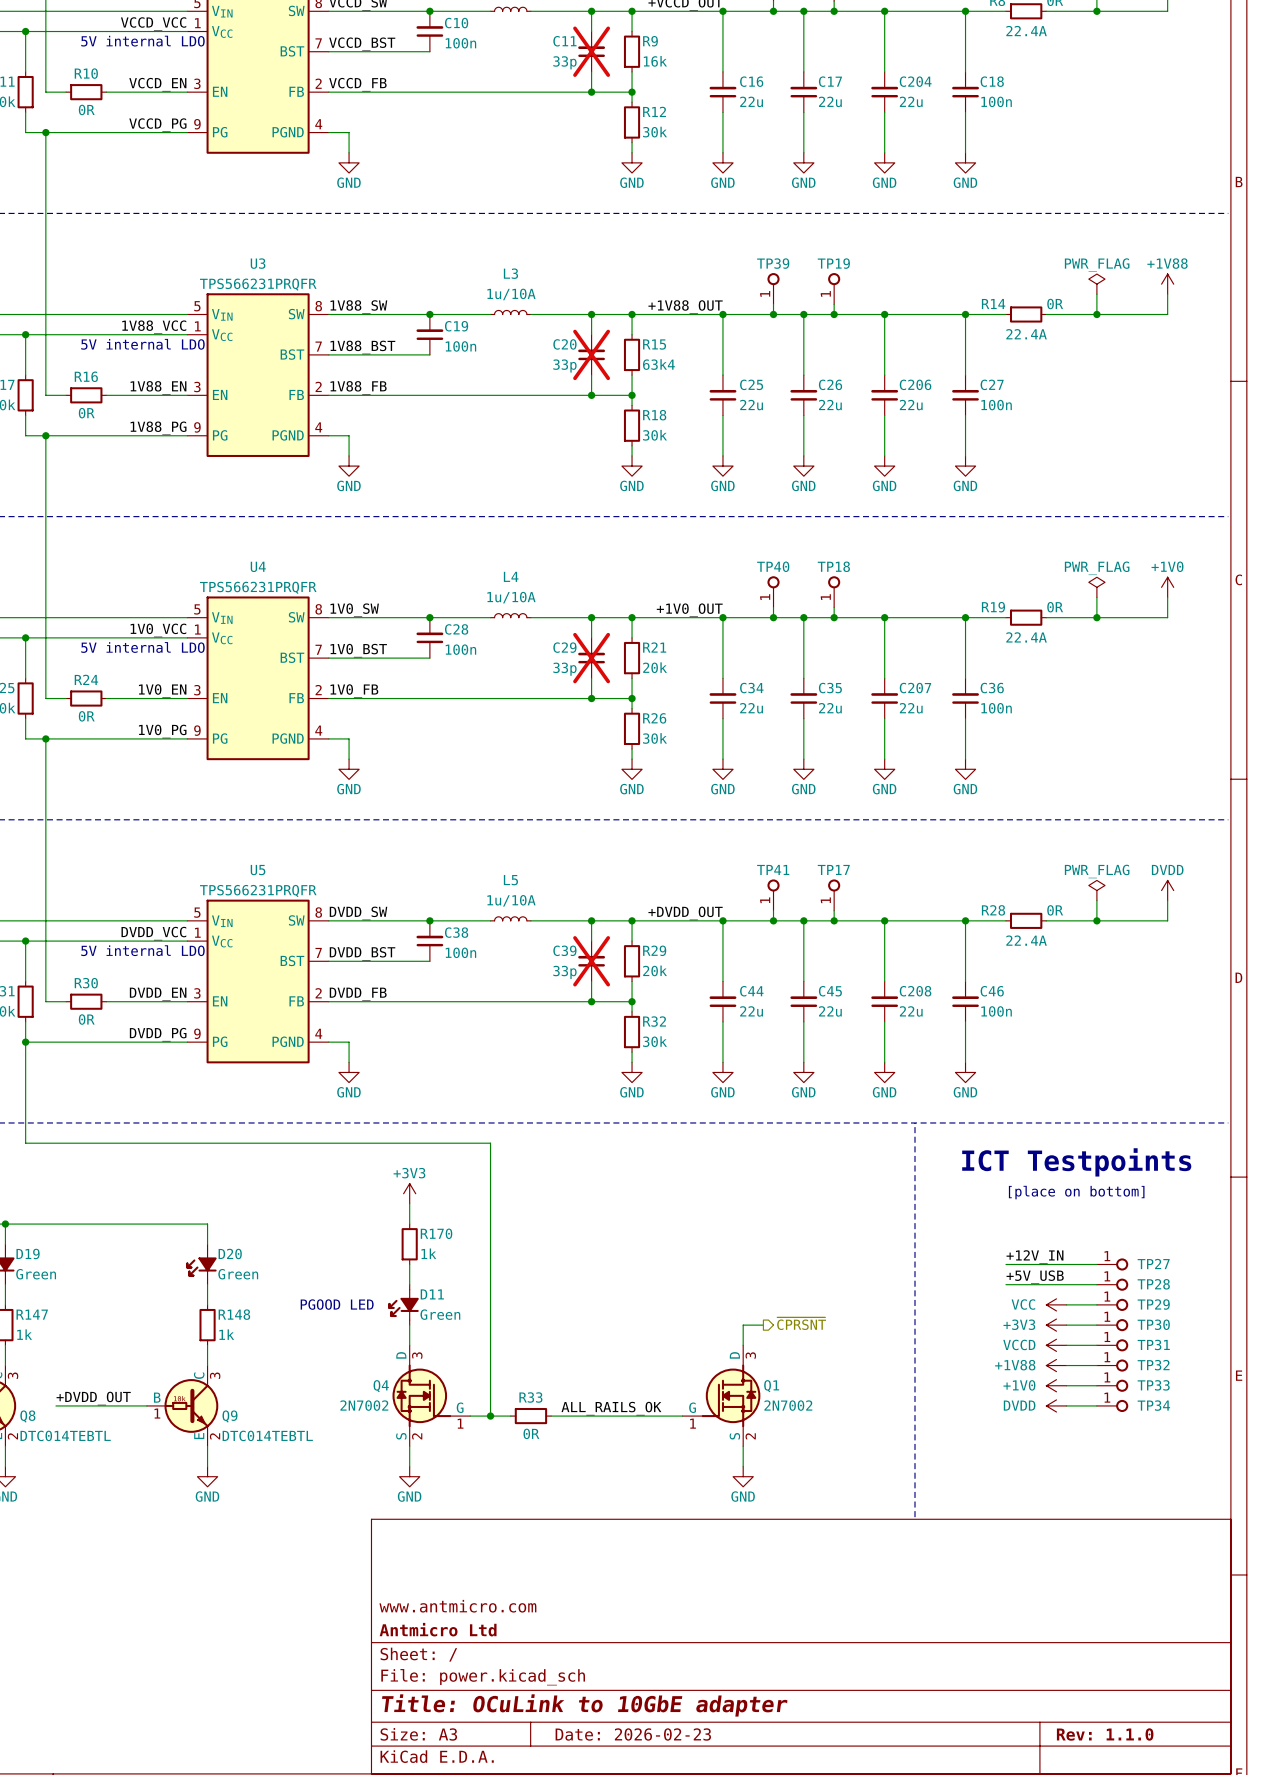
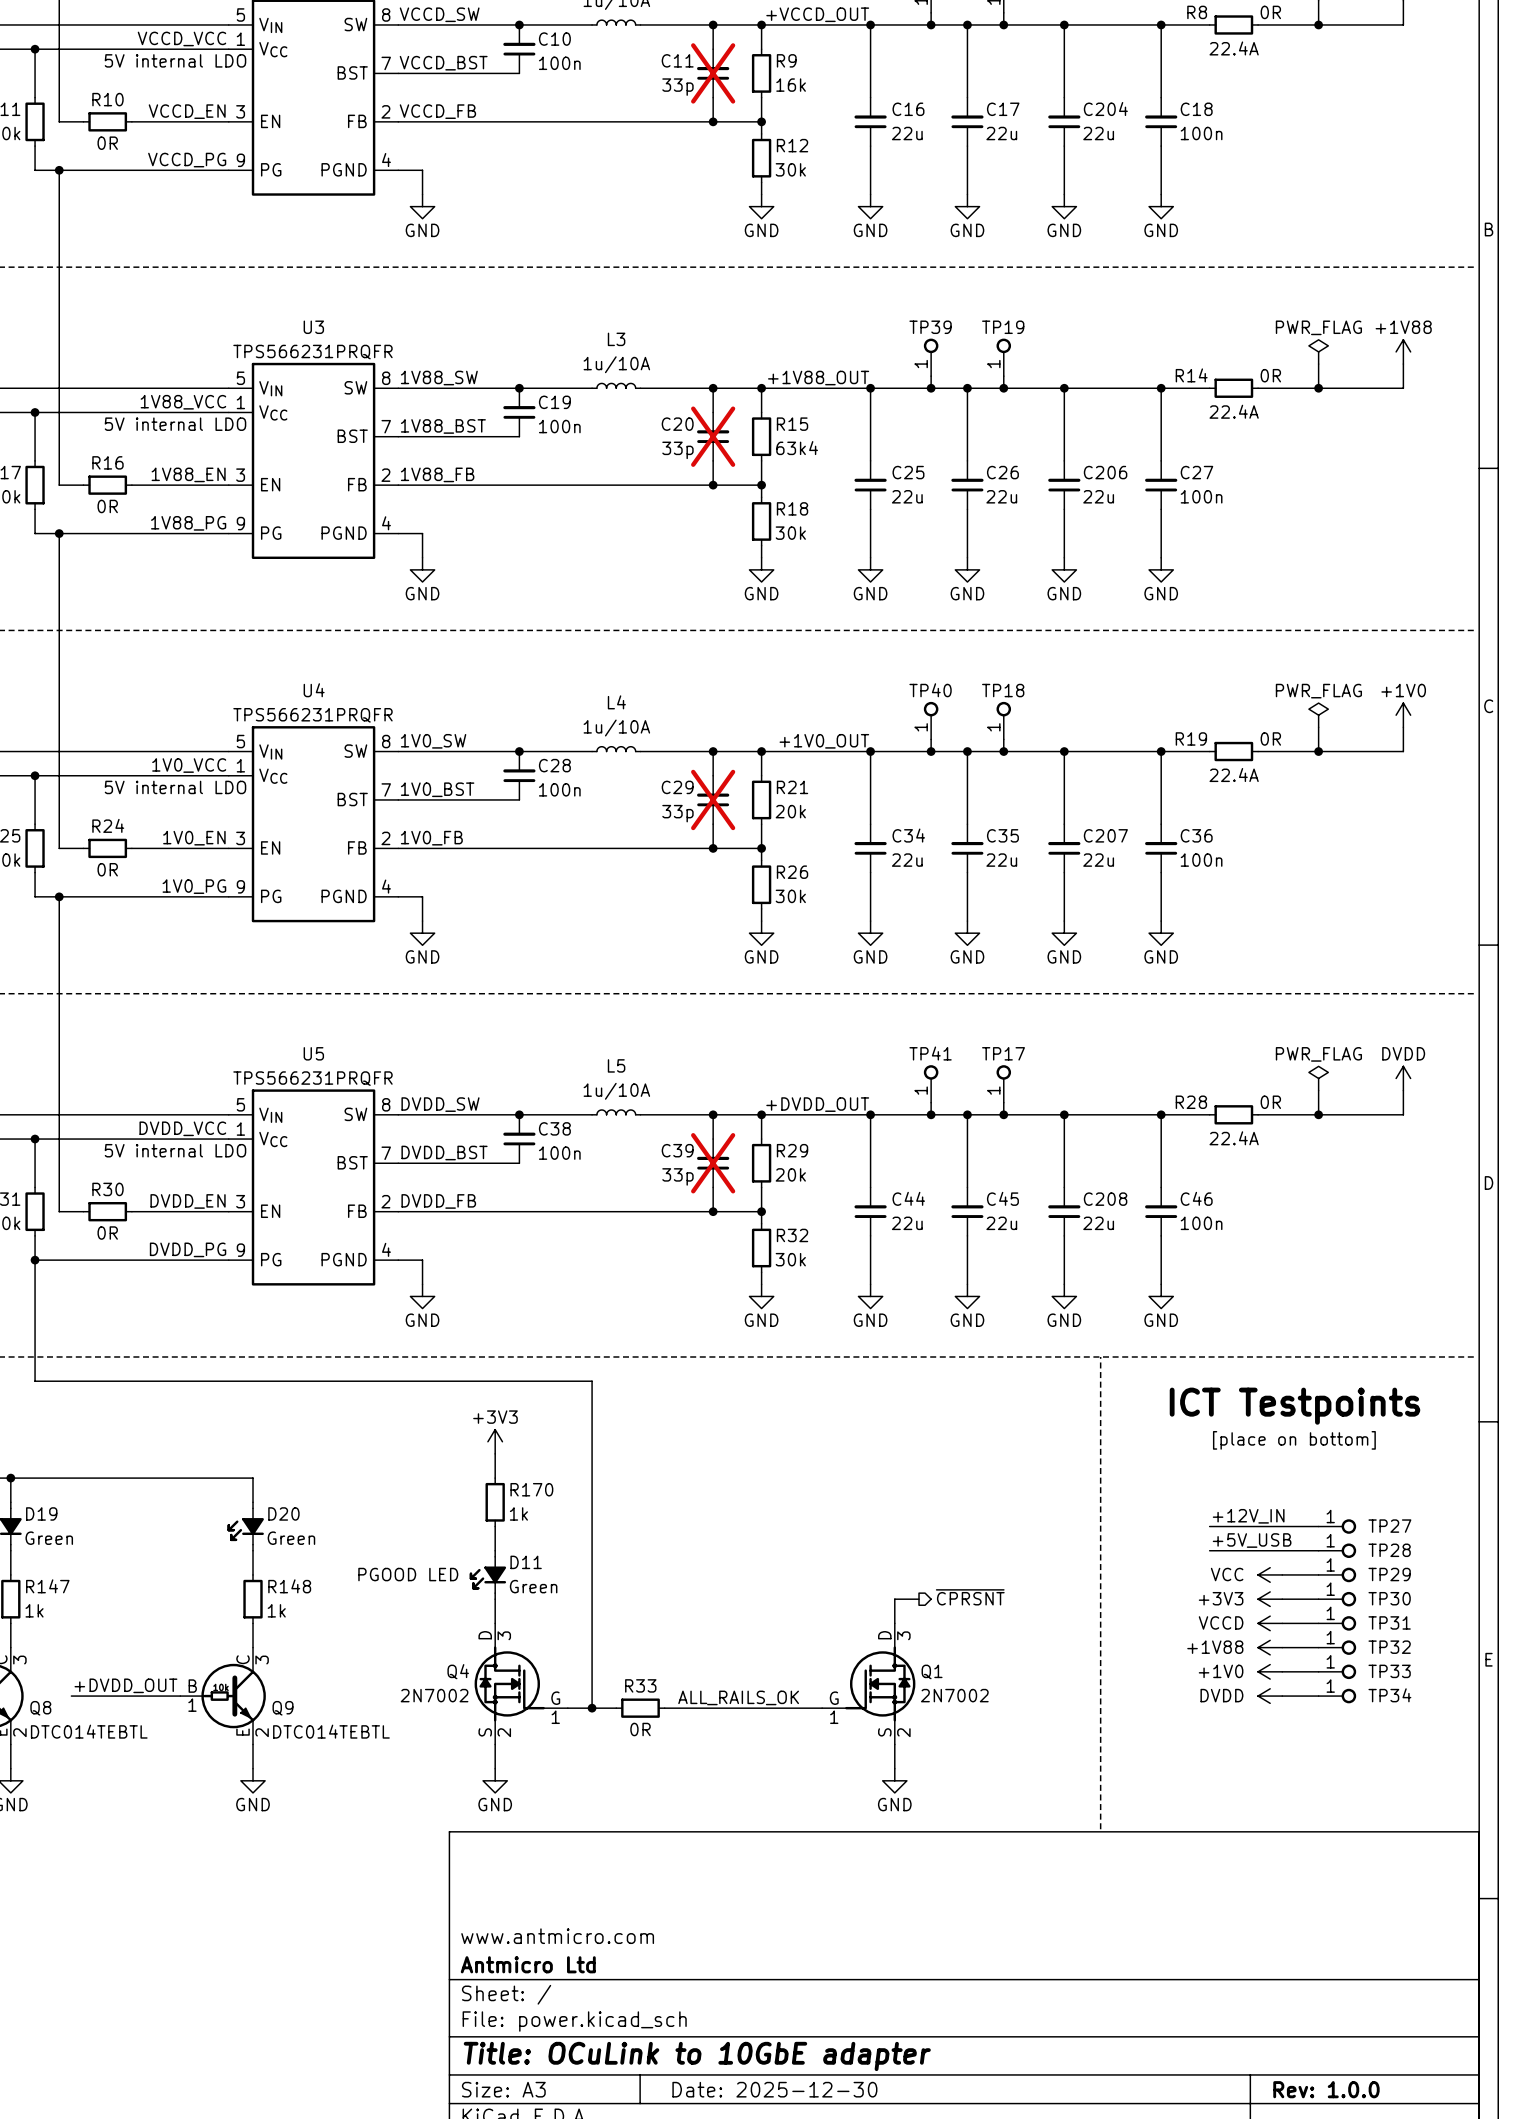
title block: Date: 2026-02-23 (633, 1734) -> Date: 2025-12-30 (774, 2089)
title block: Rev: 1.1.0 (1105, 1734) -> Rev: 1.0.0 (1326, 2089)

